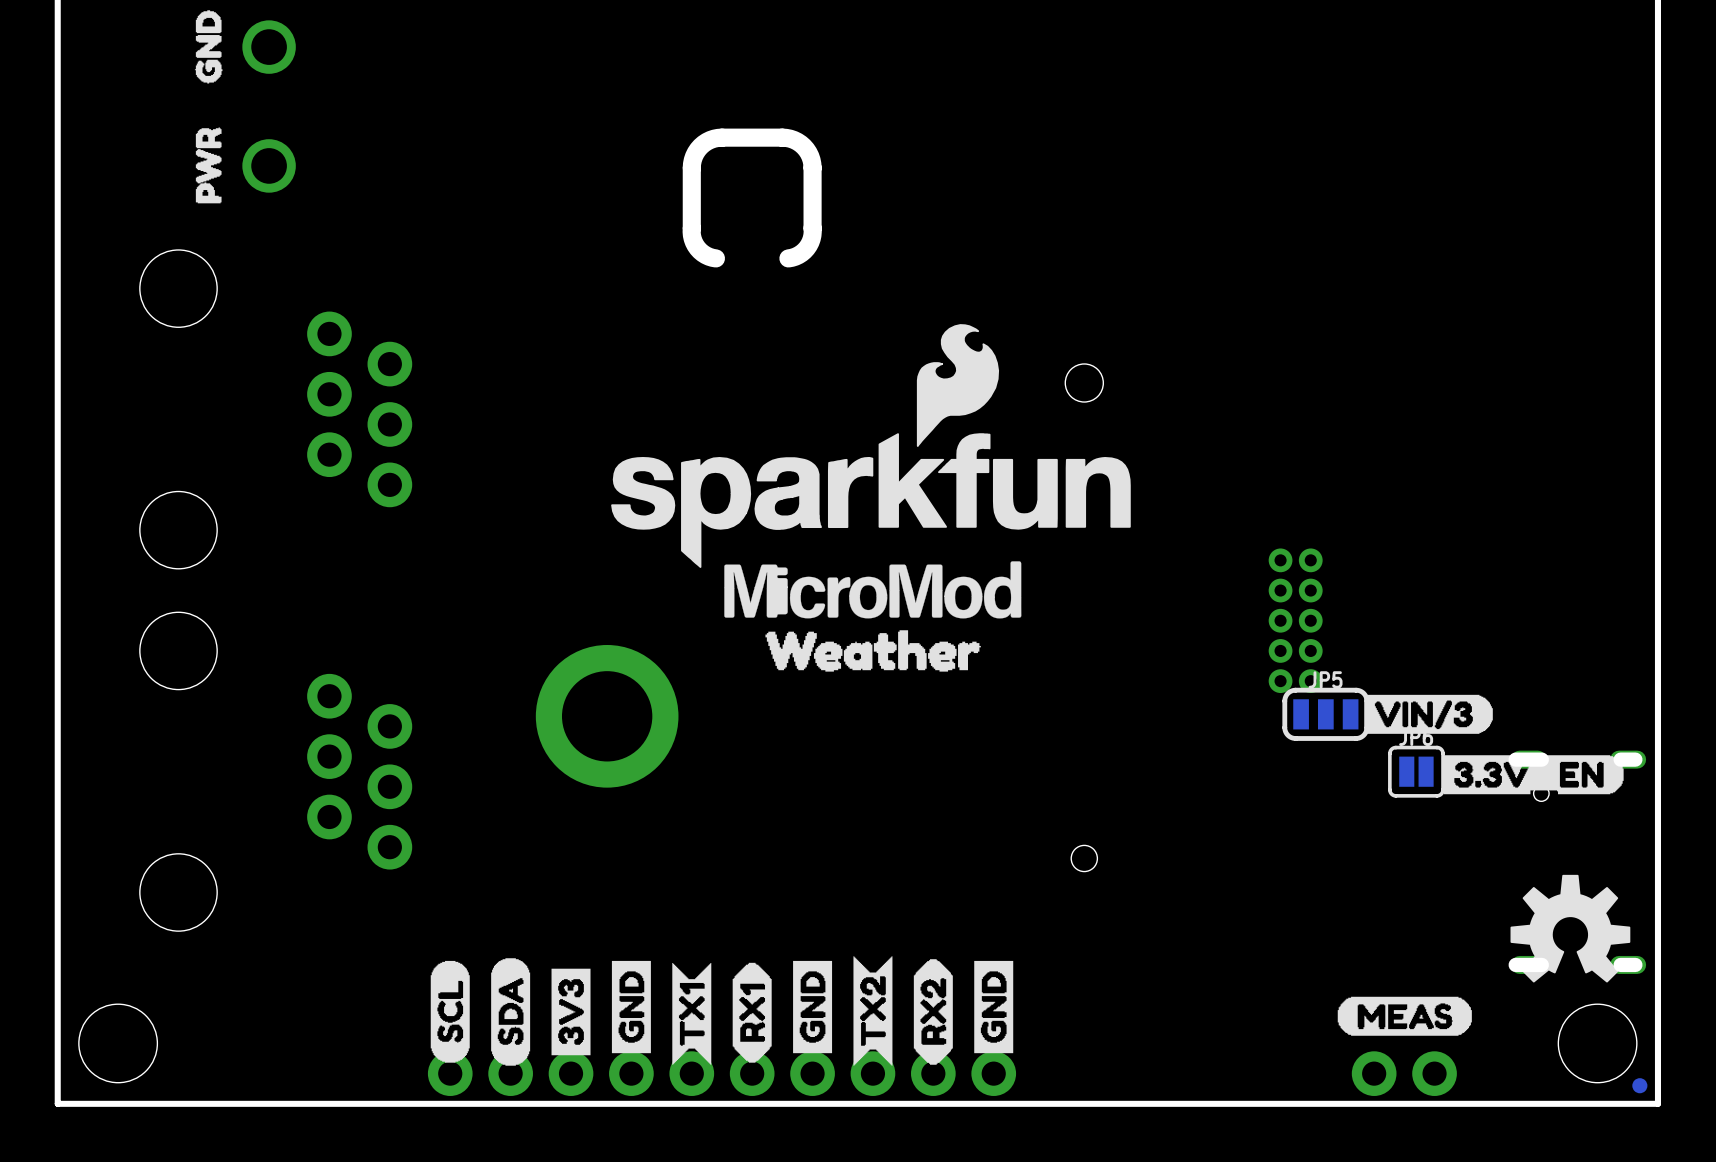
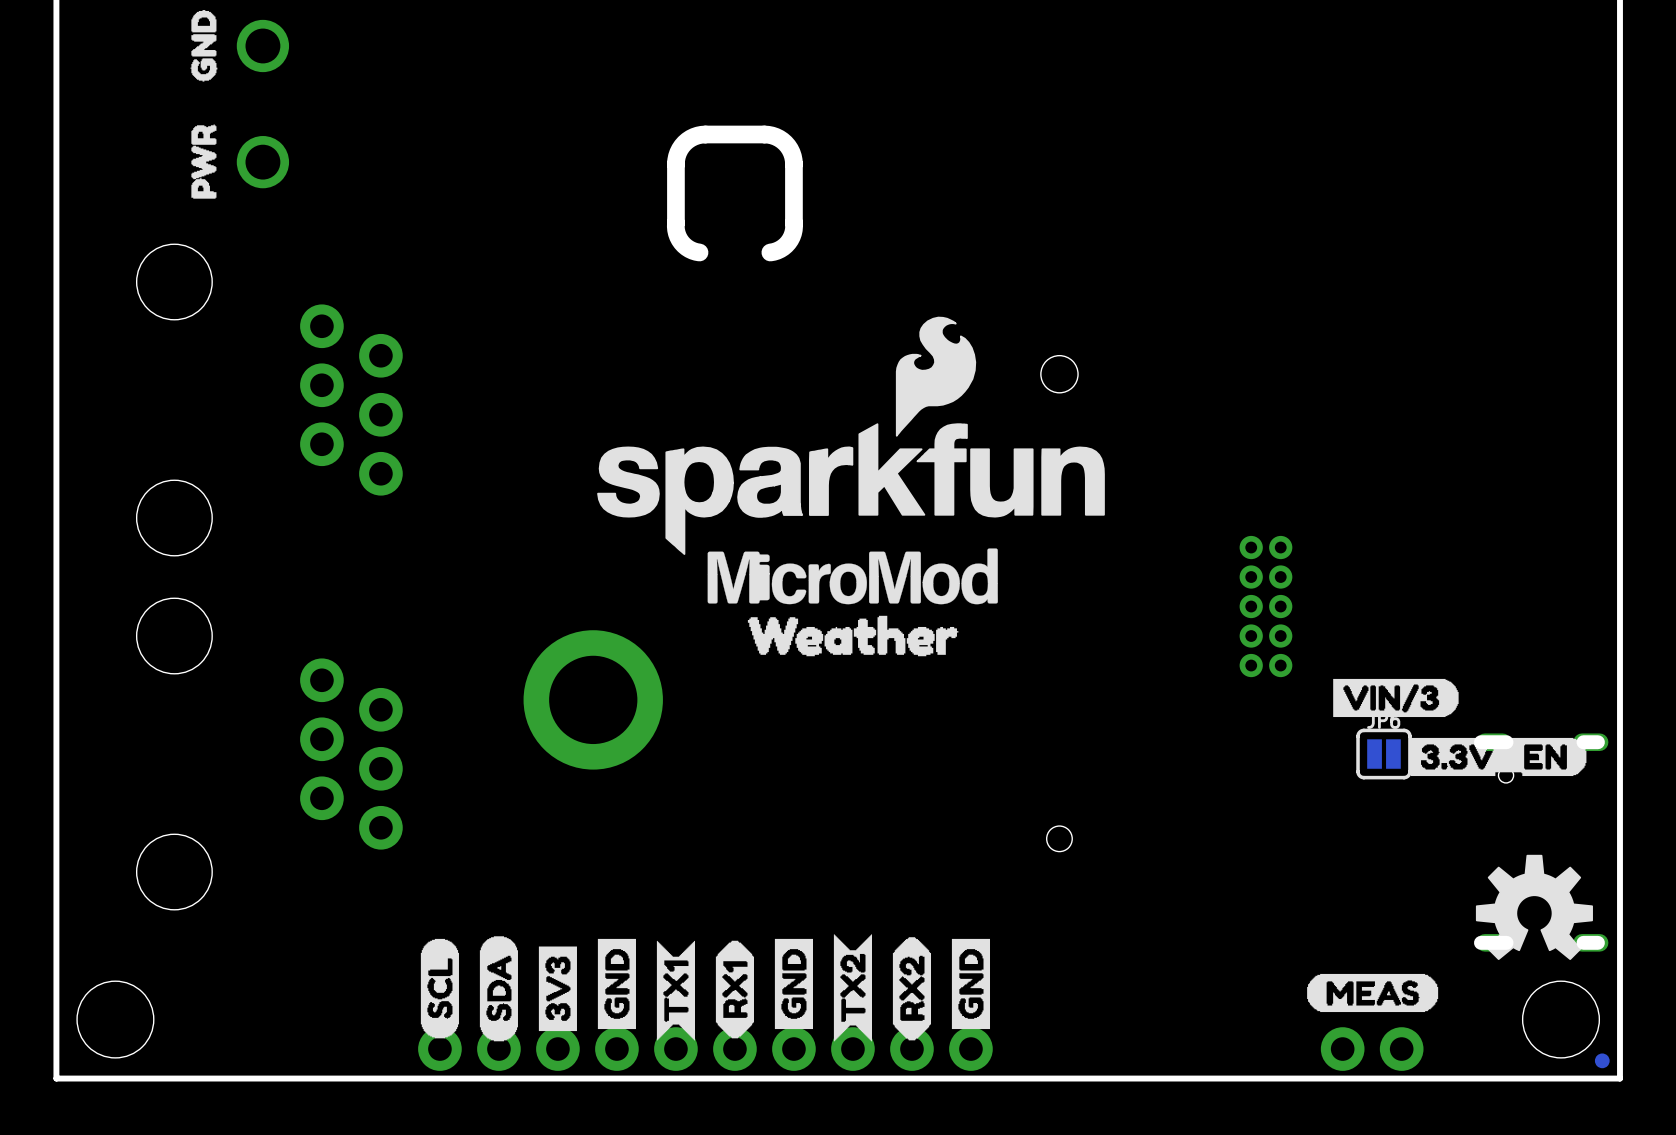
JP5: (1325, 714) -> none

